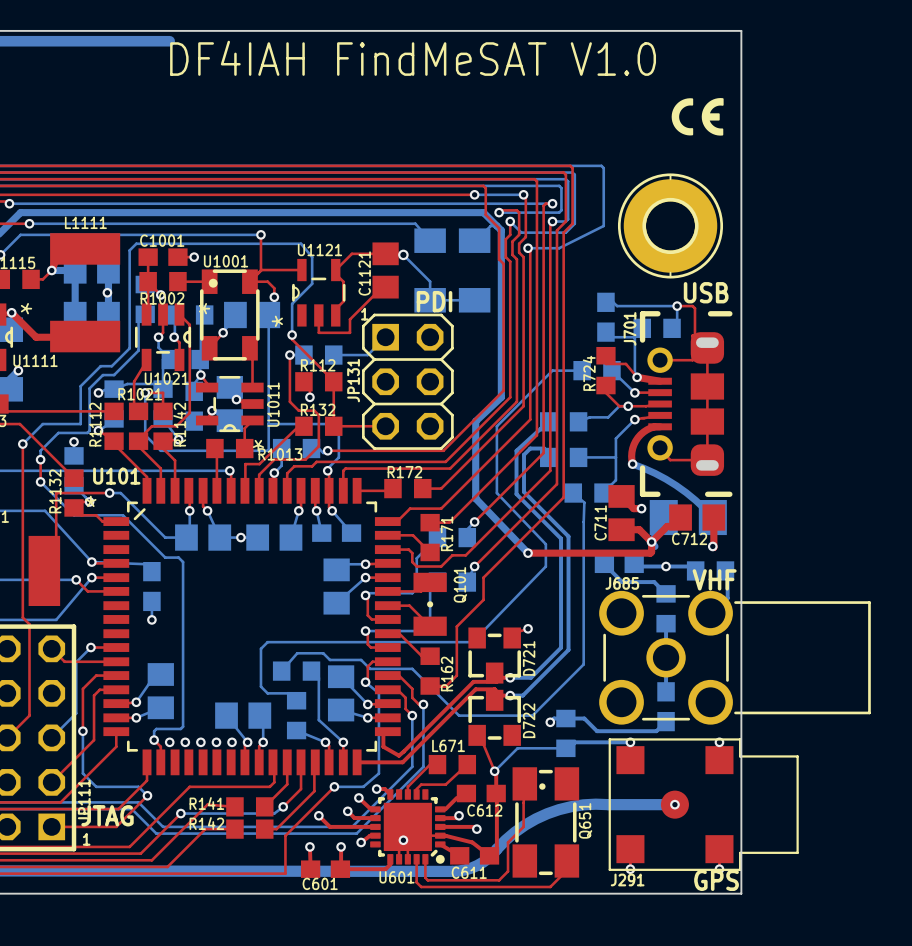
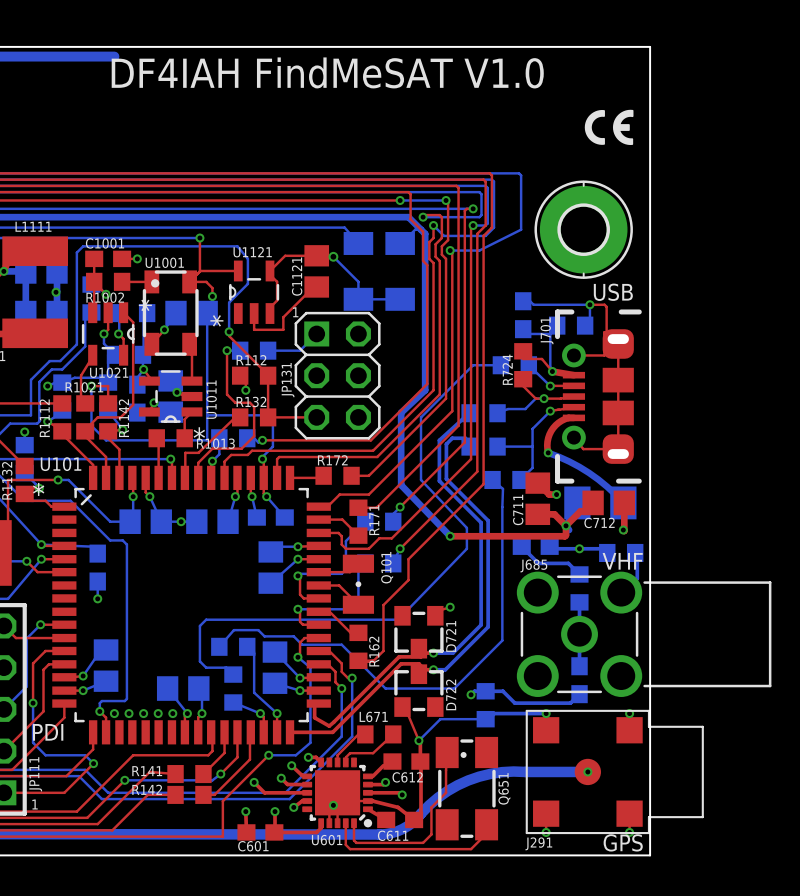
text: PDI (434, 301) -> none
text: none -> PDI (48, 732)
text: JTAG (107, 815) -> none

